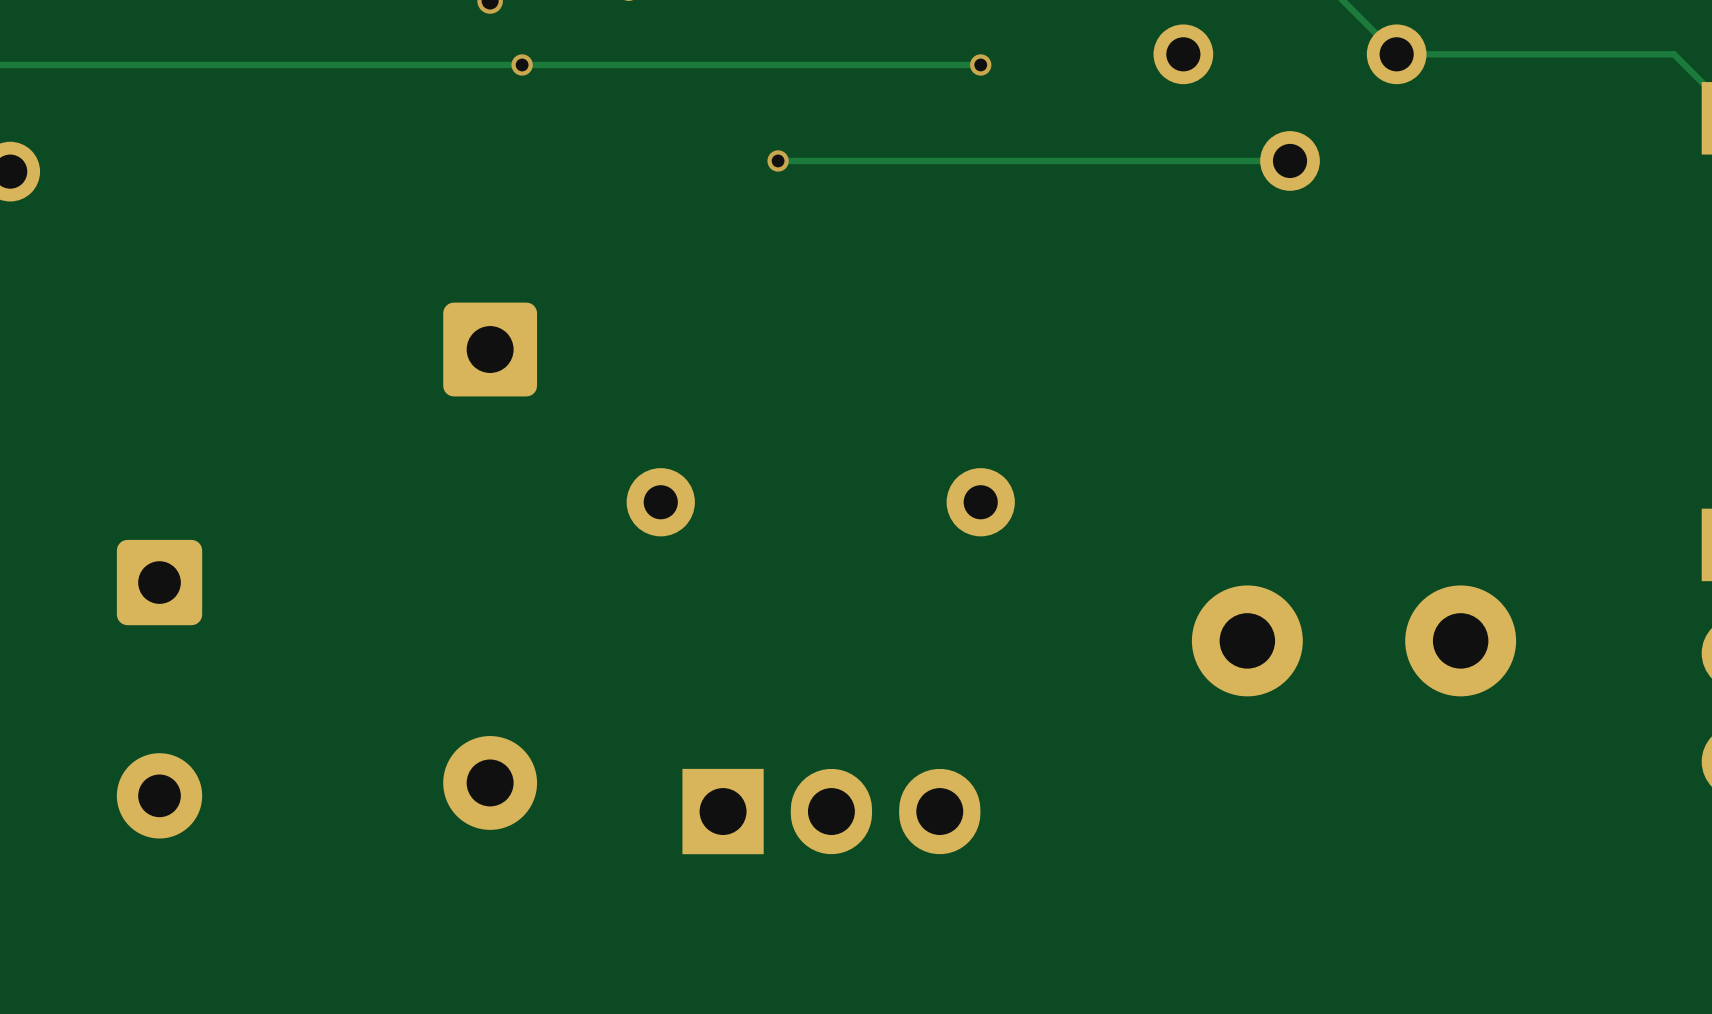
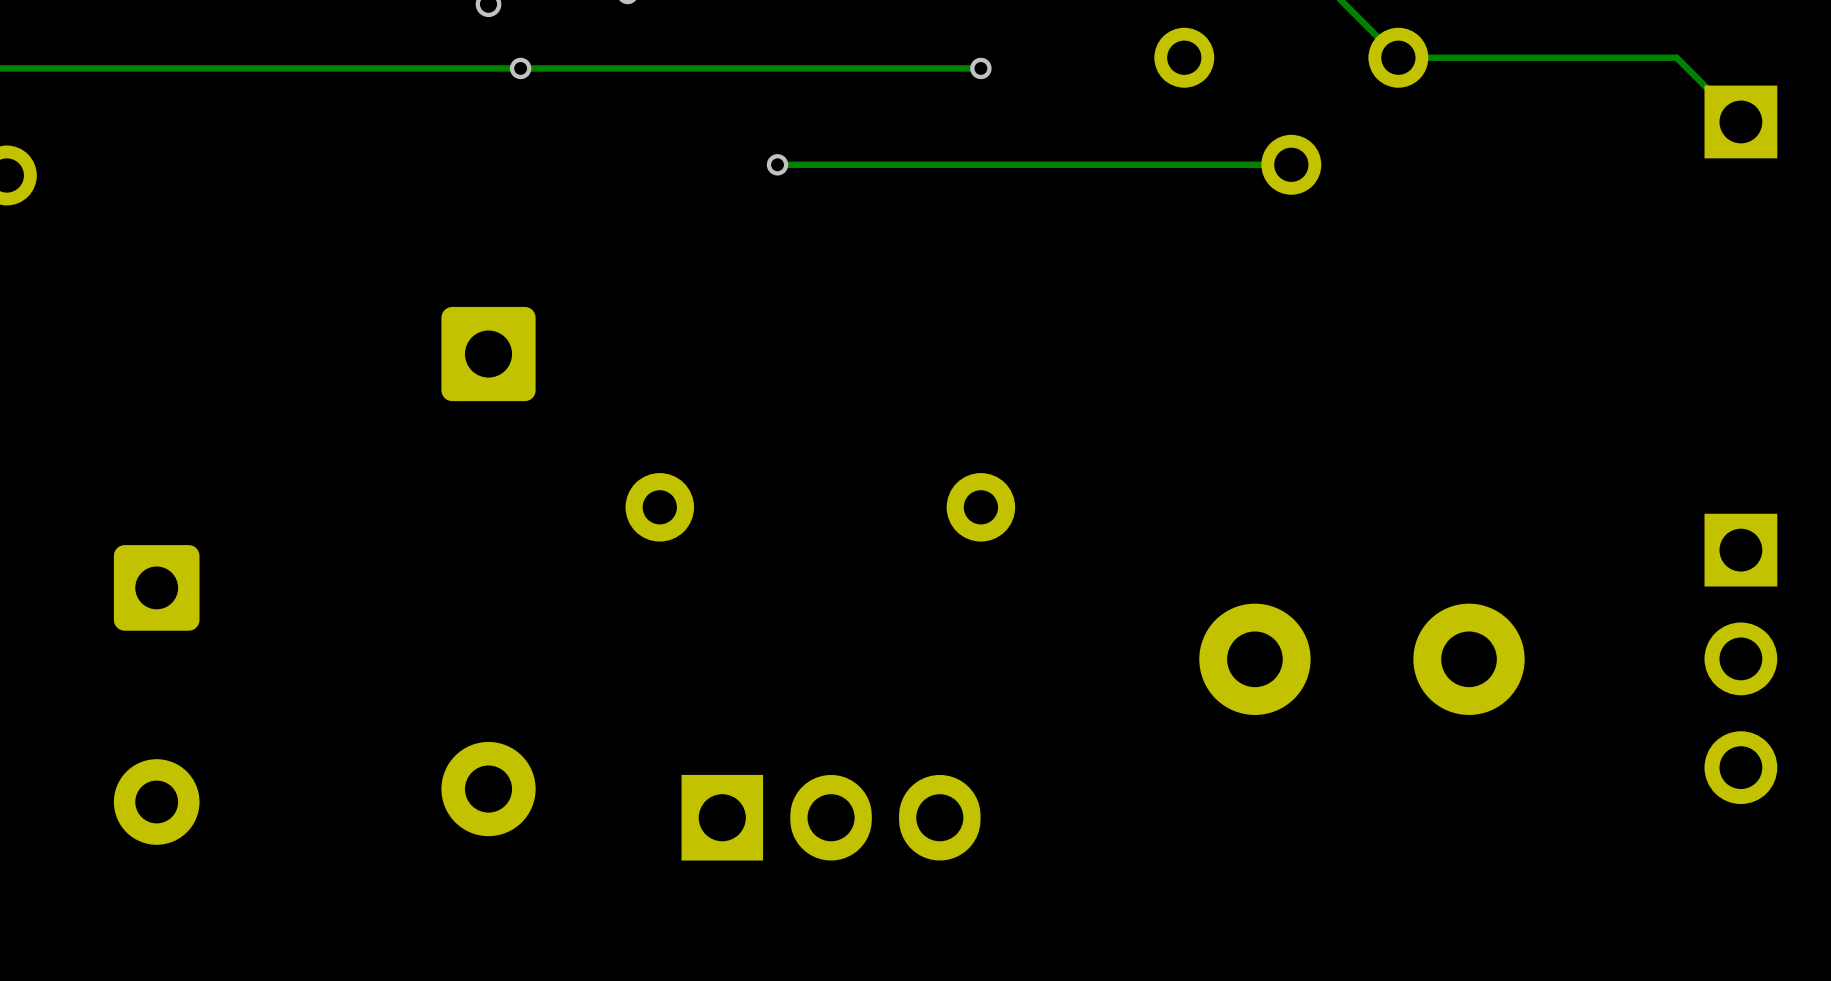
part position: (1354, 640) -> (1361, 659)

